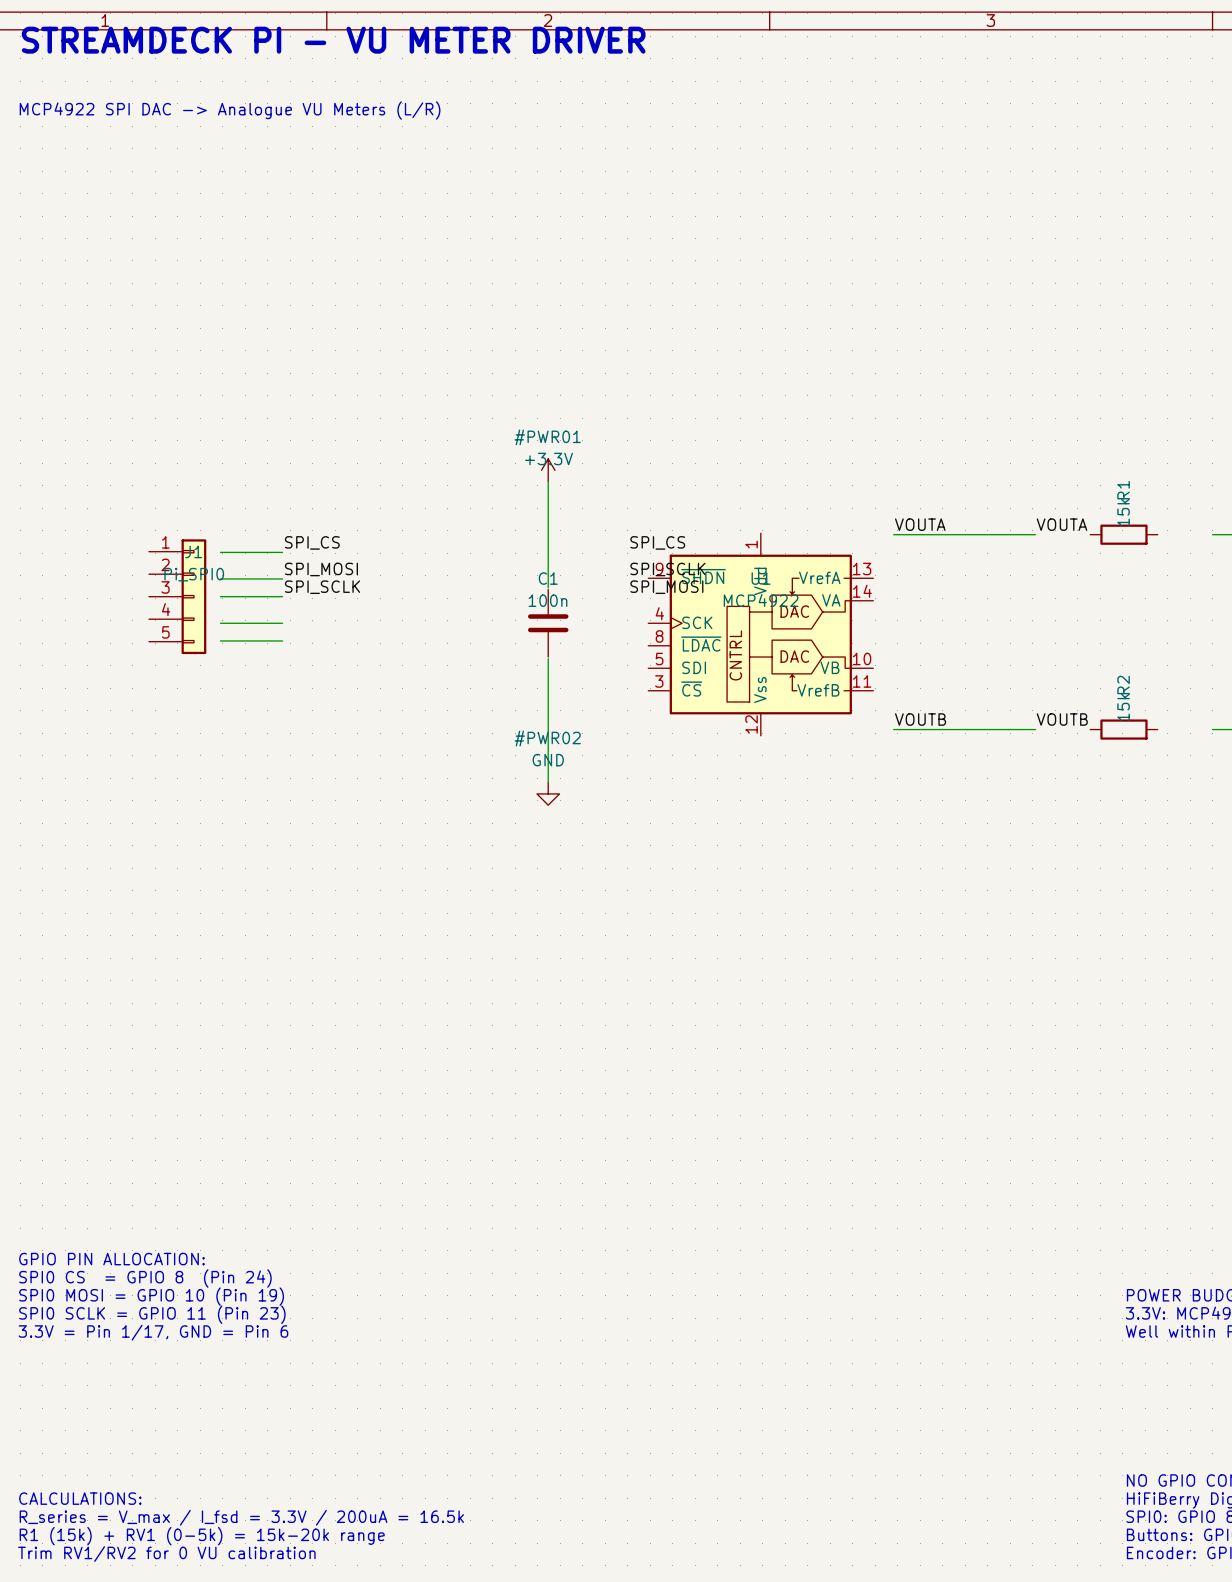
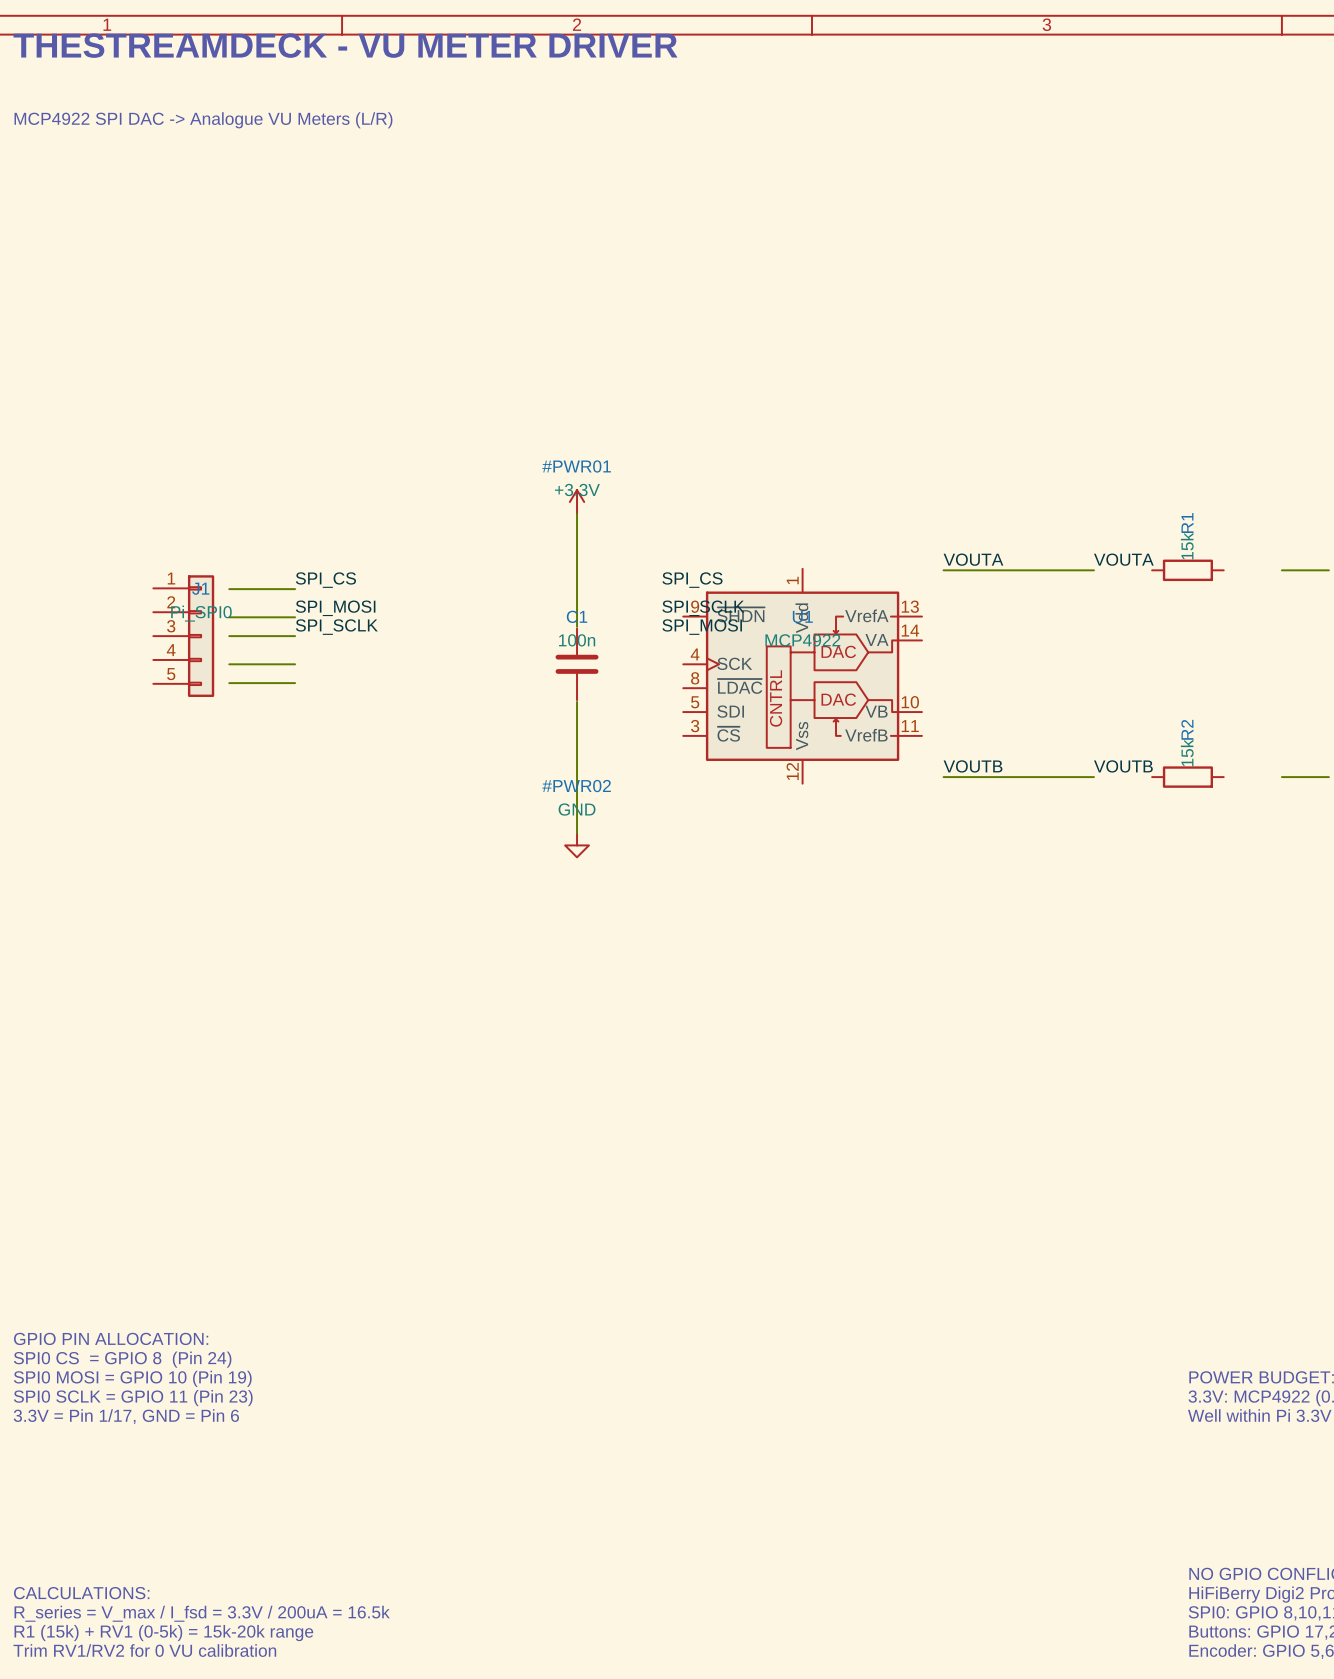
text: STREAMDECK PI - VU METER DRIVER (333, 40) -> THESTREAMDECK - VU METER DRIVER (345, 45)

